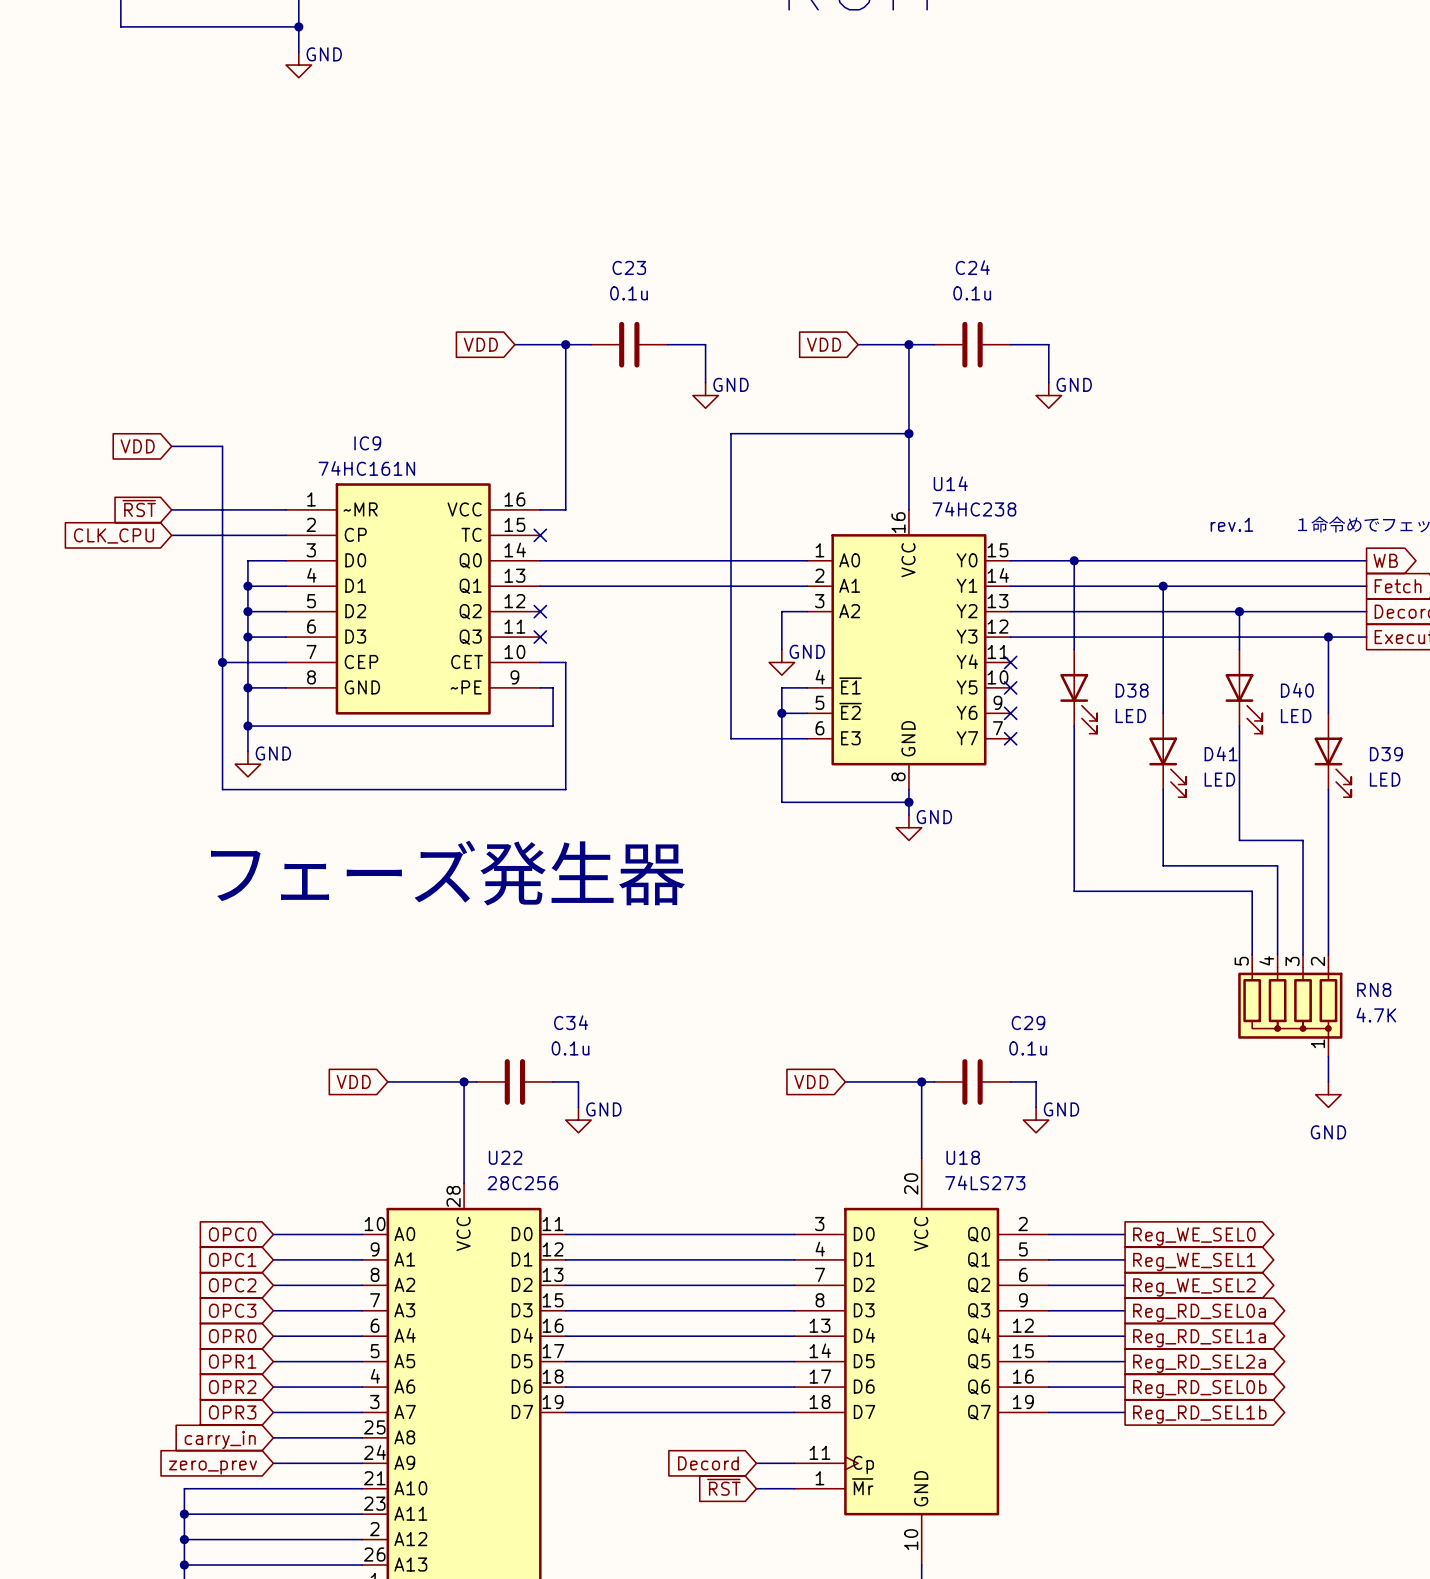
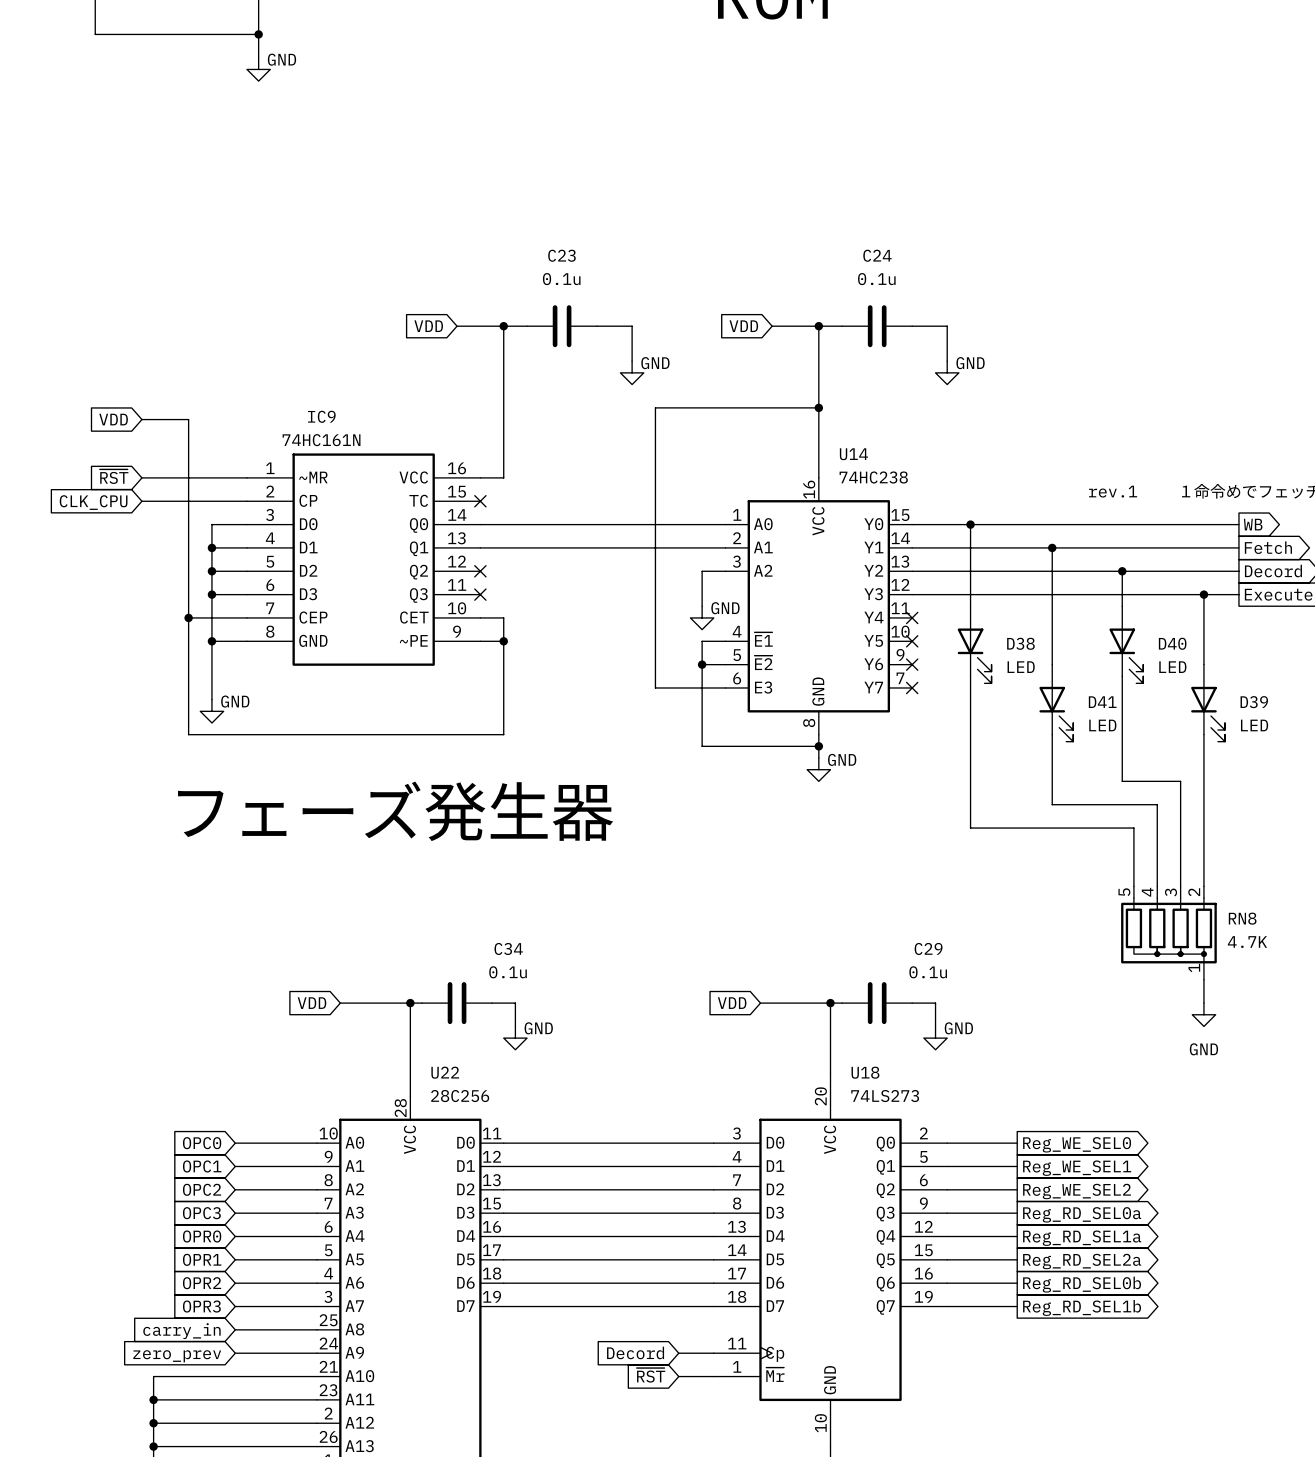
wire: (553, 687) (553, 726) (247, 726) -> (492, 641) (503, 641)
junction: none -> (503, 641)
junction: (247, 726) -> none

